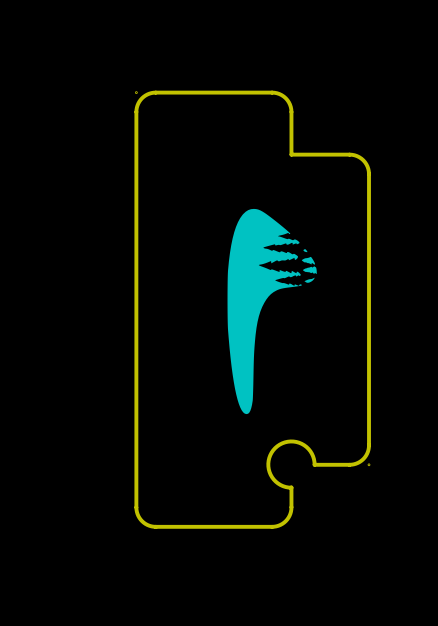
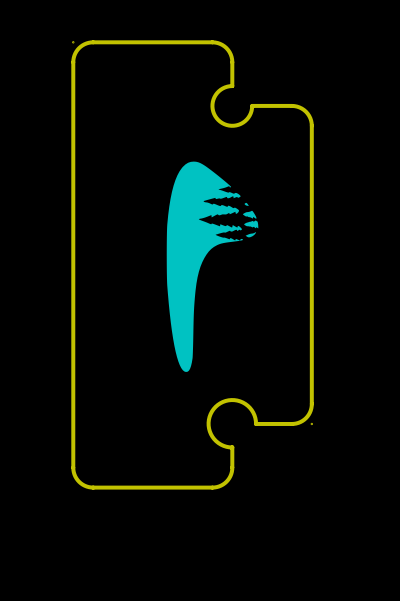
board edge: (291, 135) (291, 154) (310, 154) -> (232, 86) (220, 89) (213, 99) (213, 111) (218, 119) (229, 125) (238, 124) (248, 117) (252, 105)

